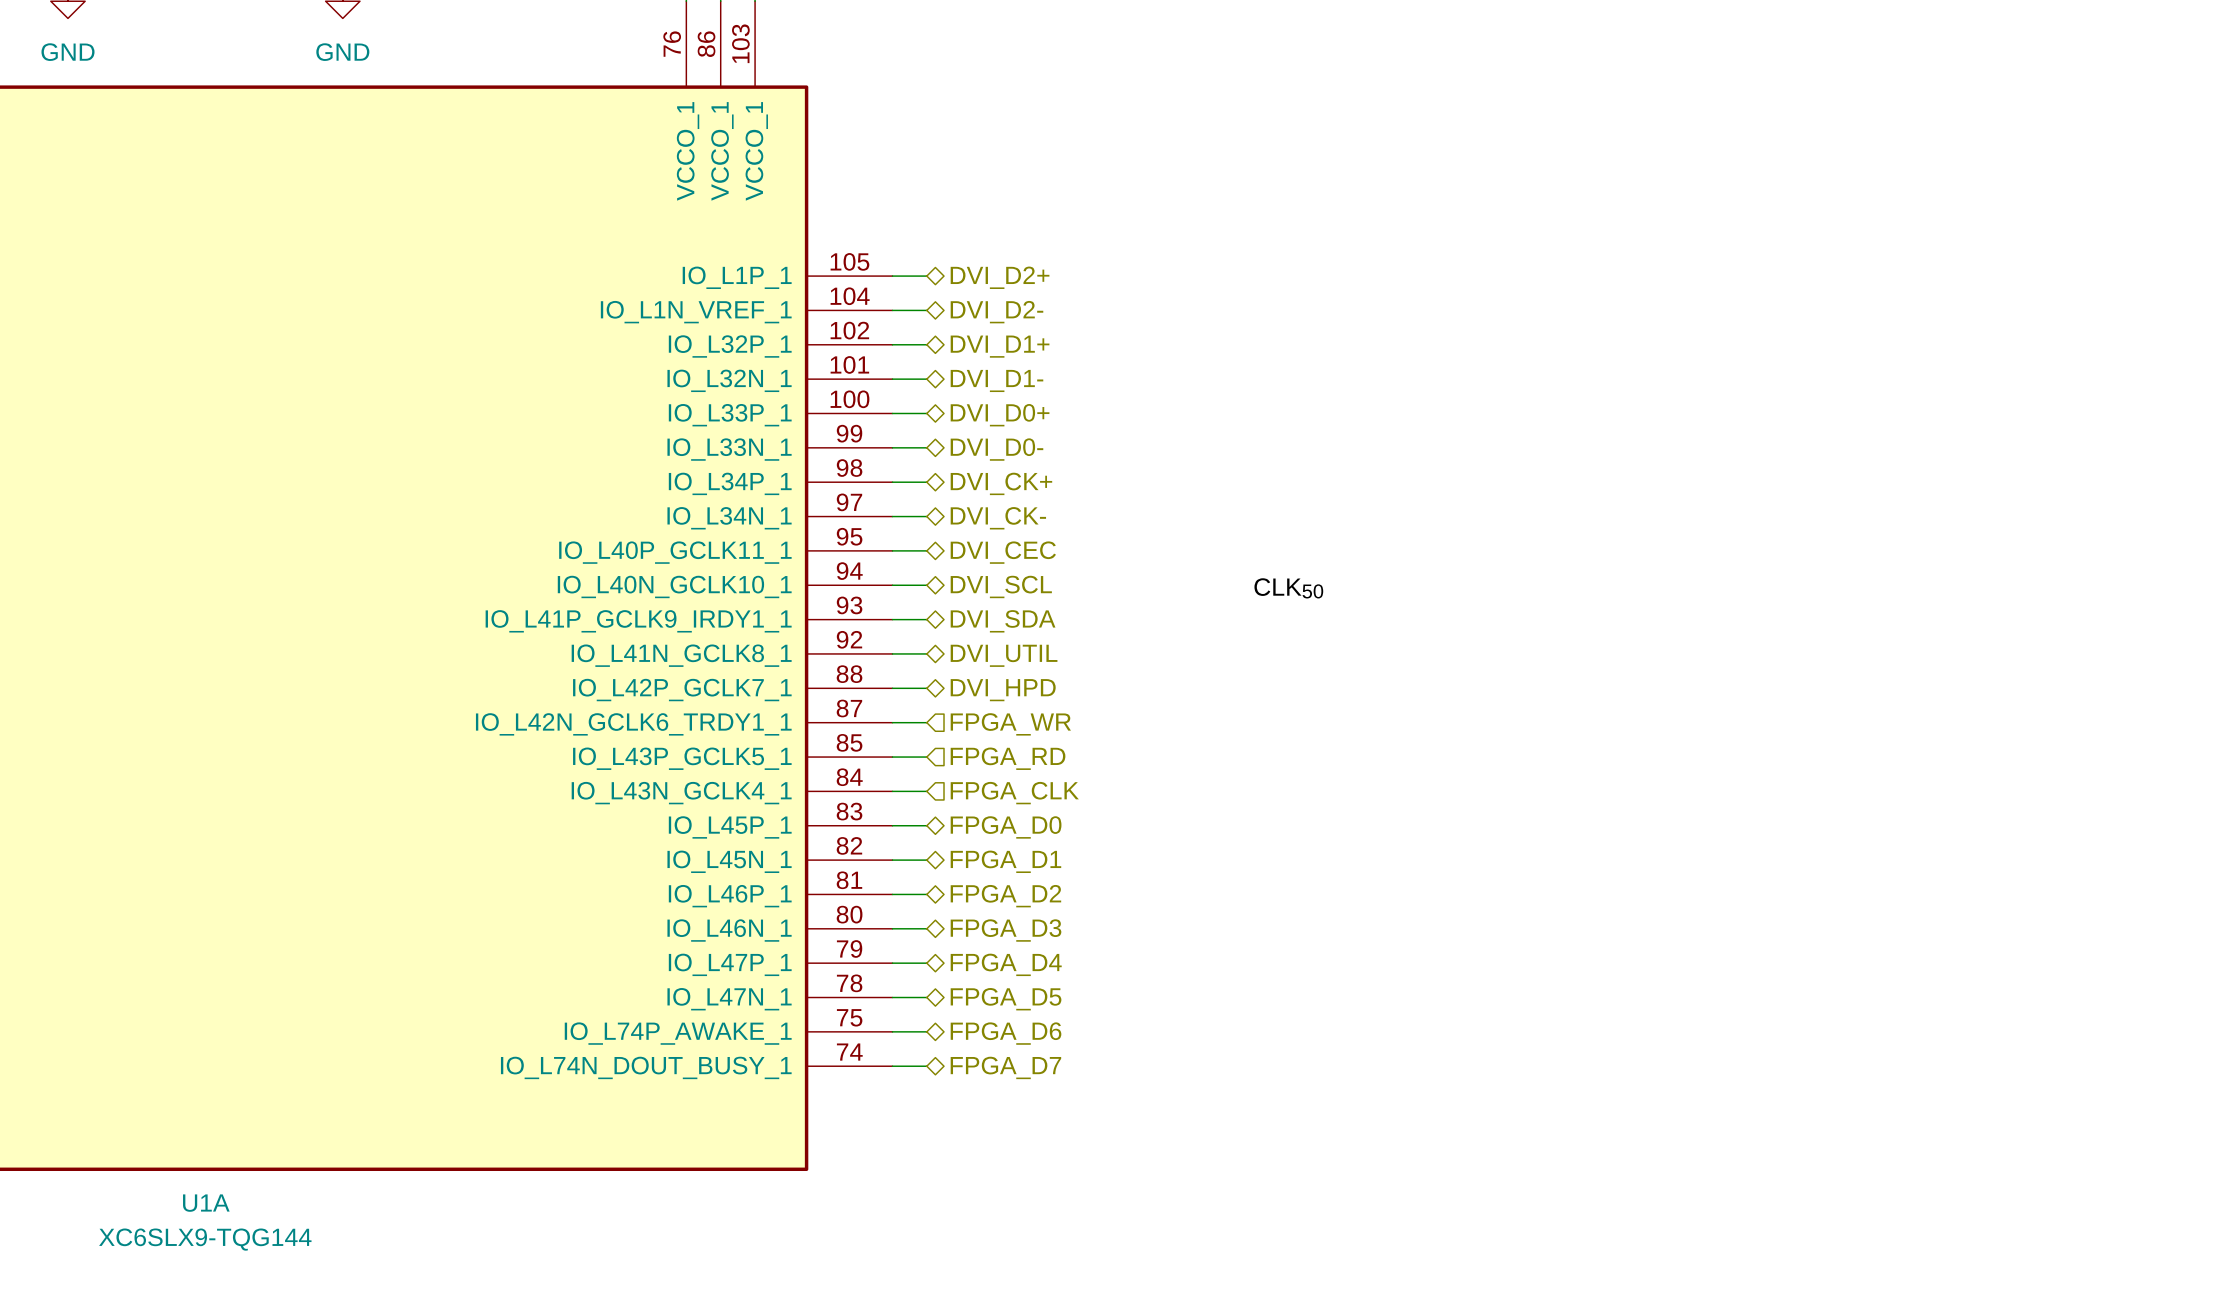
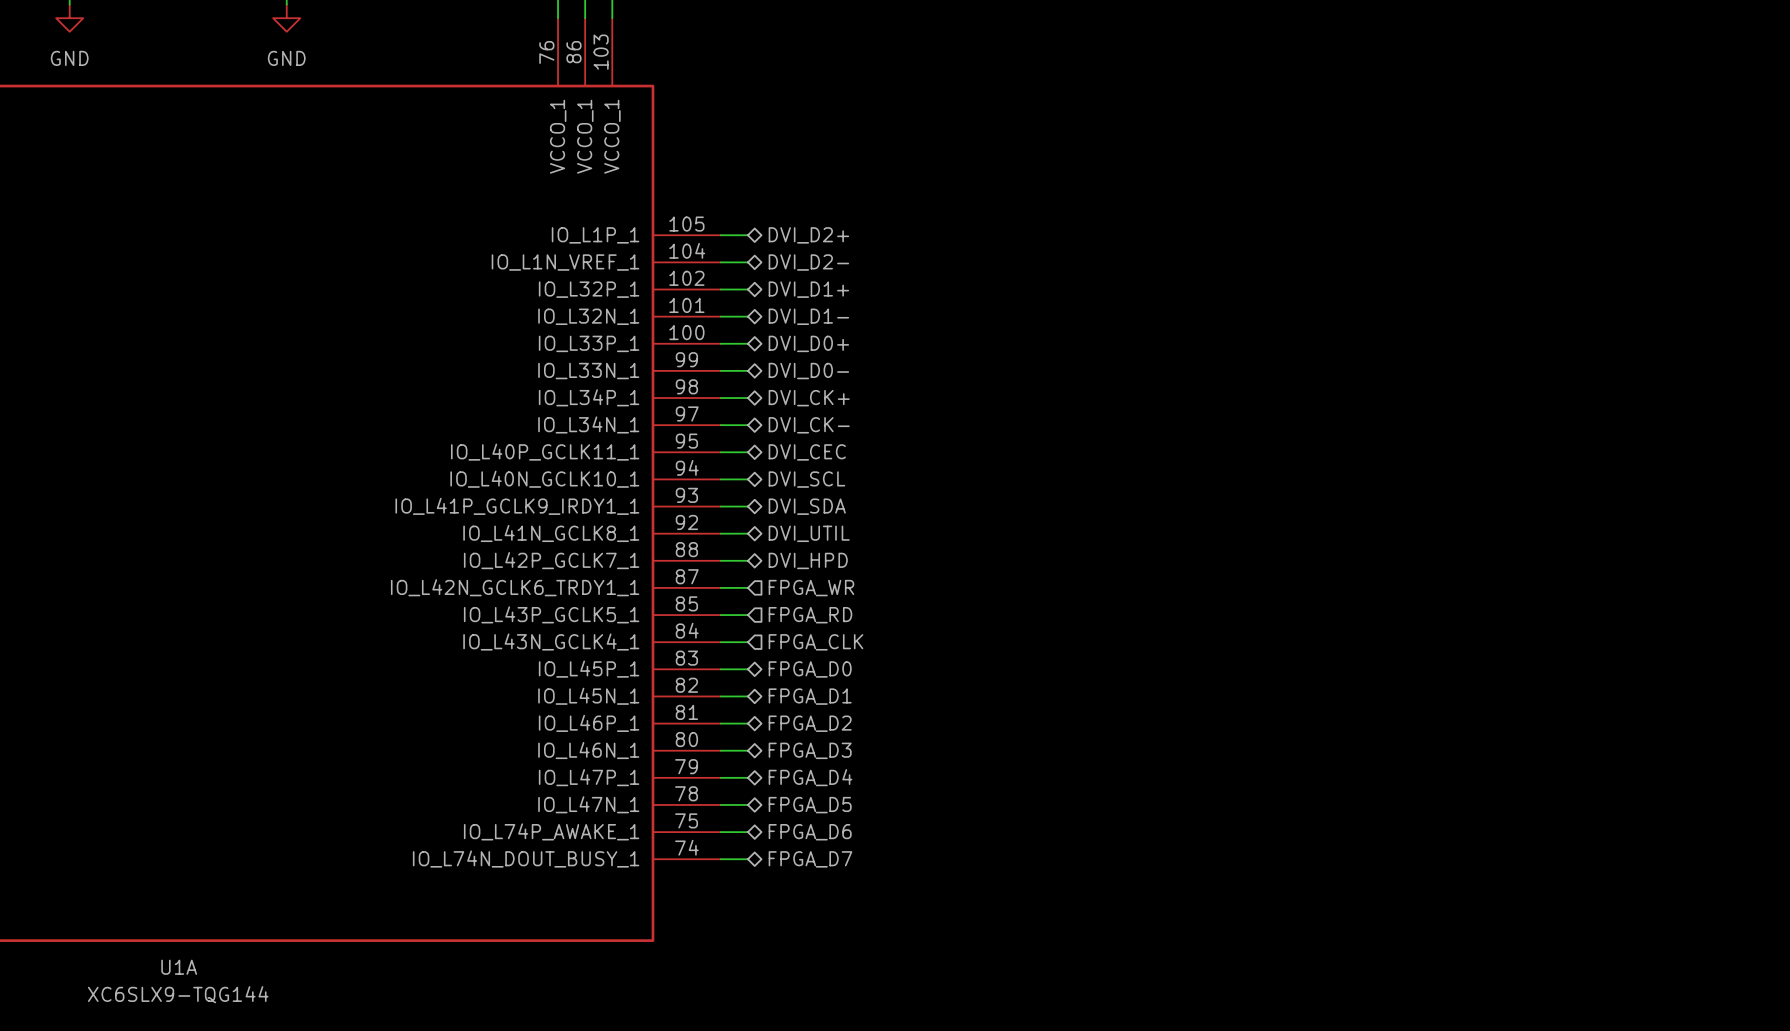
label: CLK50 (1288, 588) -> none

